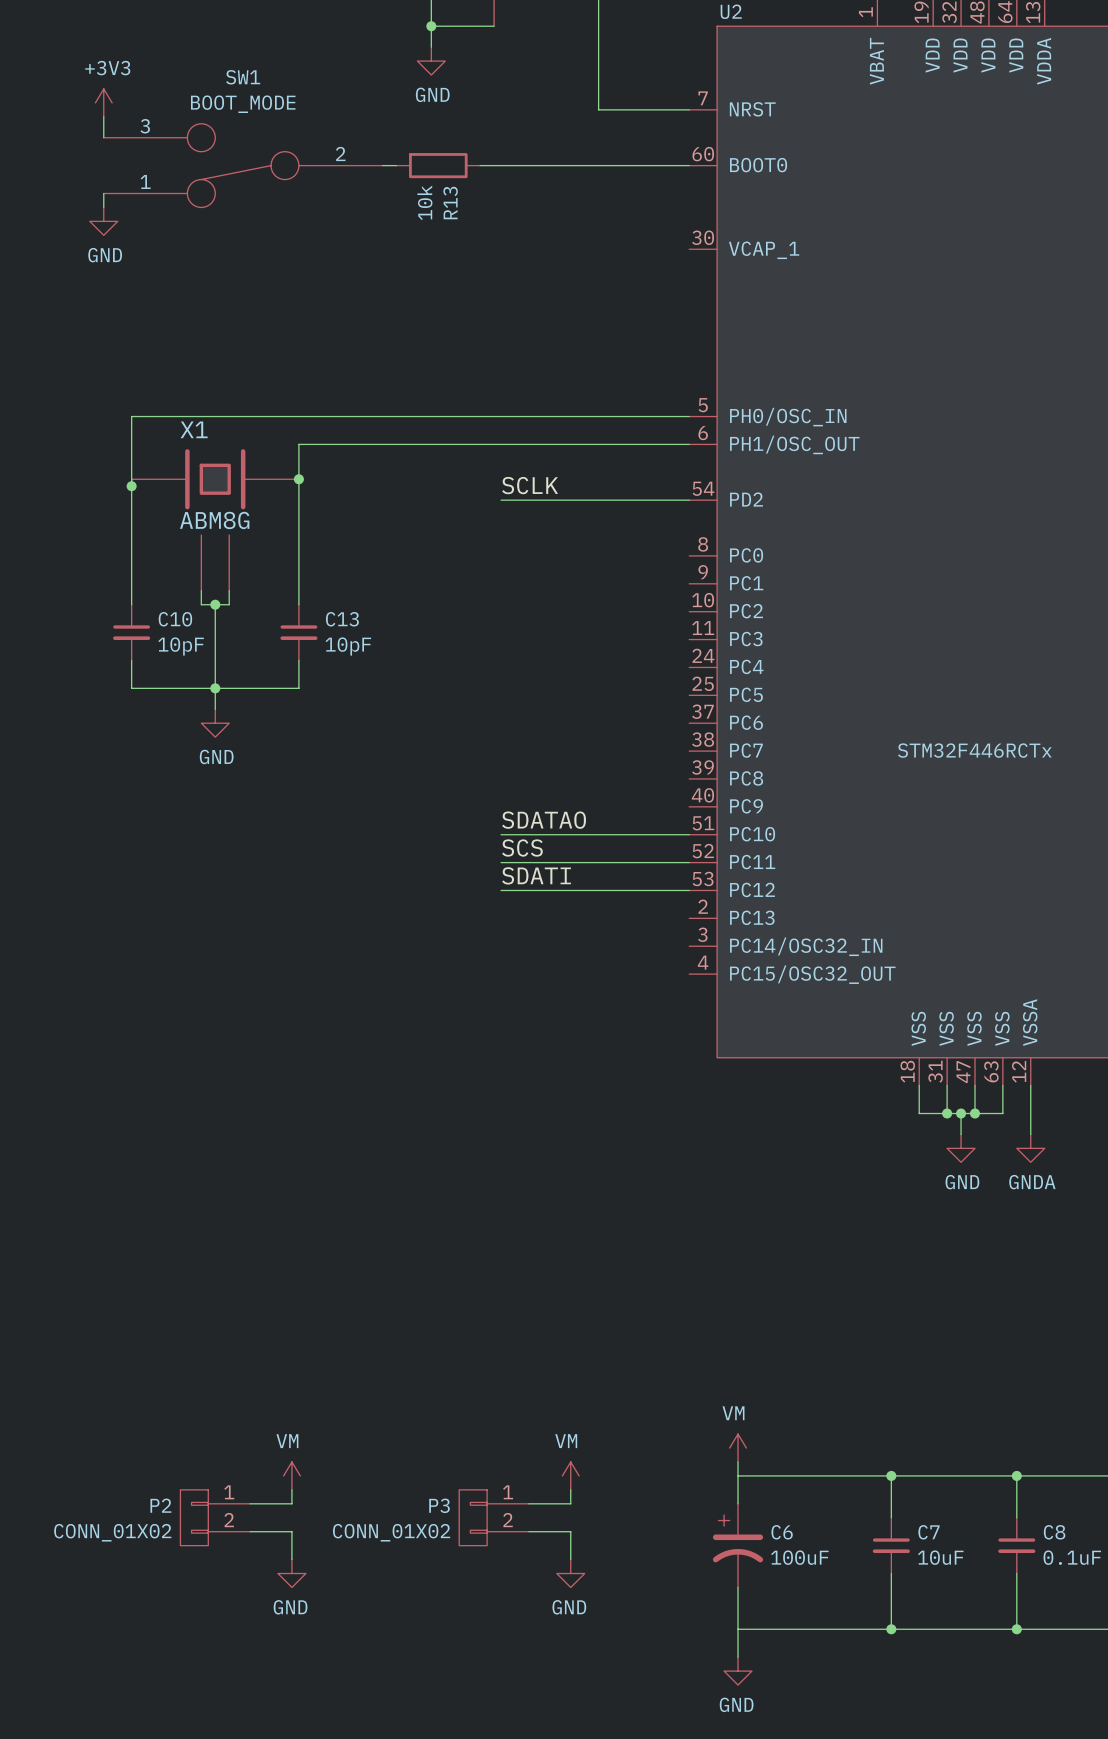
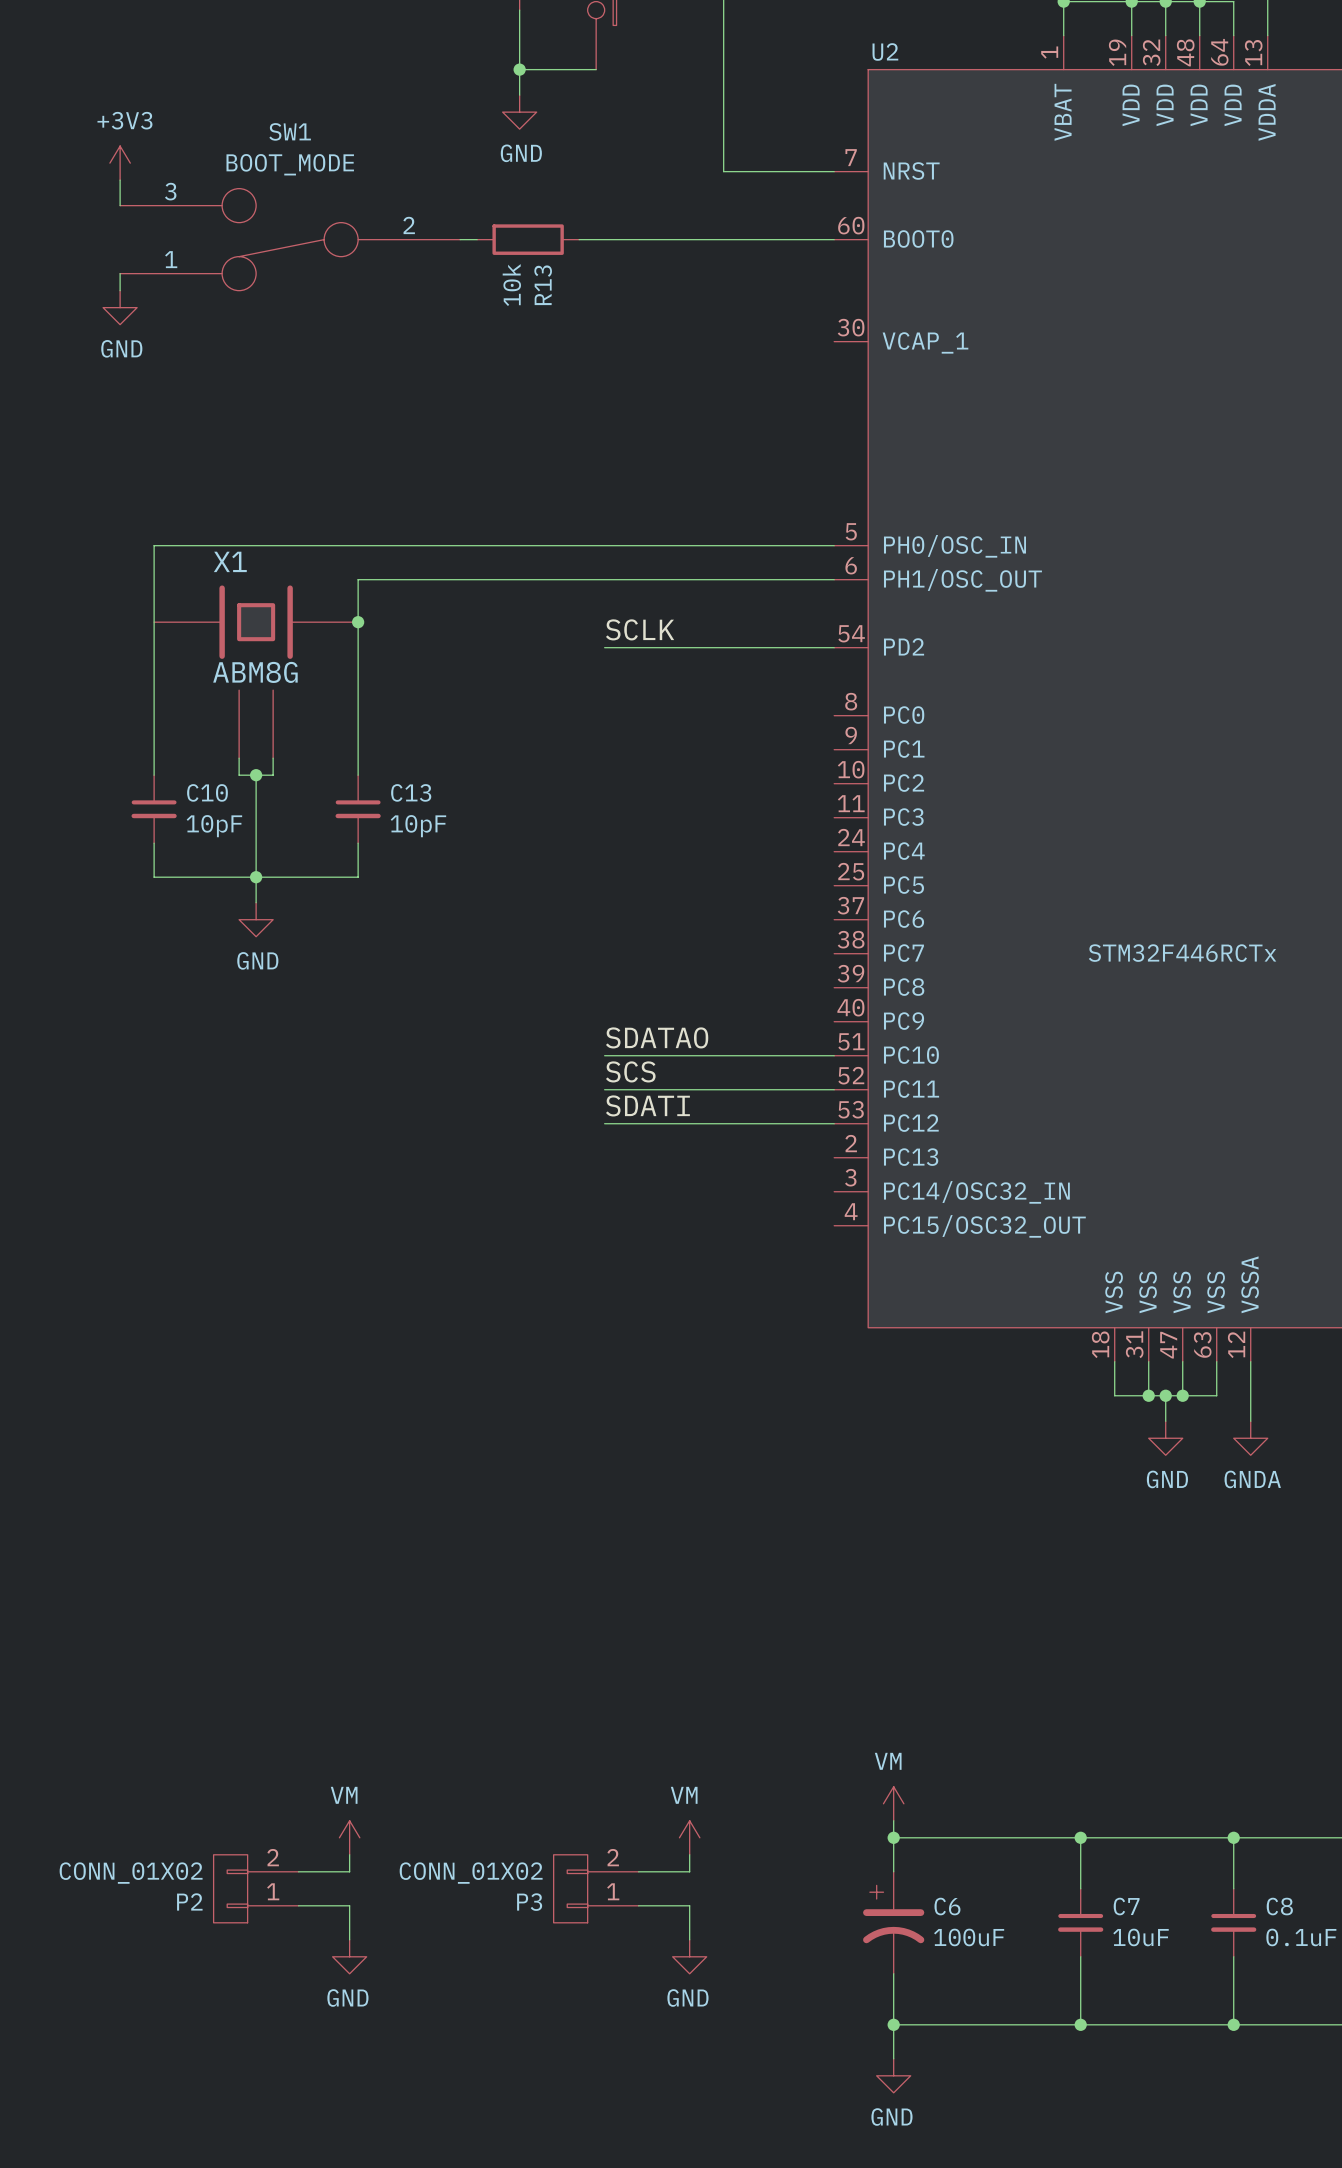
junction: (131, 486) -> none
junction: none -> (893, 1837)
P2 flip: as is (194, 1517) -> up-down (230, 1888)
P3 flip: as is (473, 1517) -> up-down (570, 1888)
junction: none -> (893, 2024)

